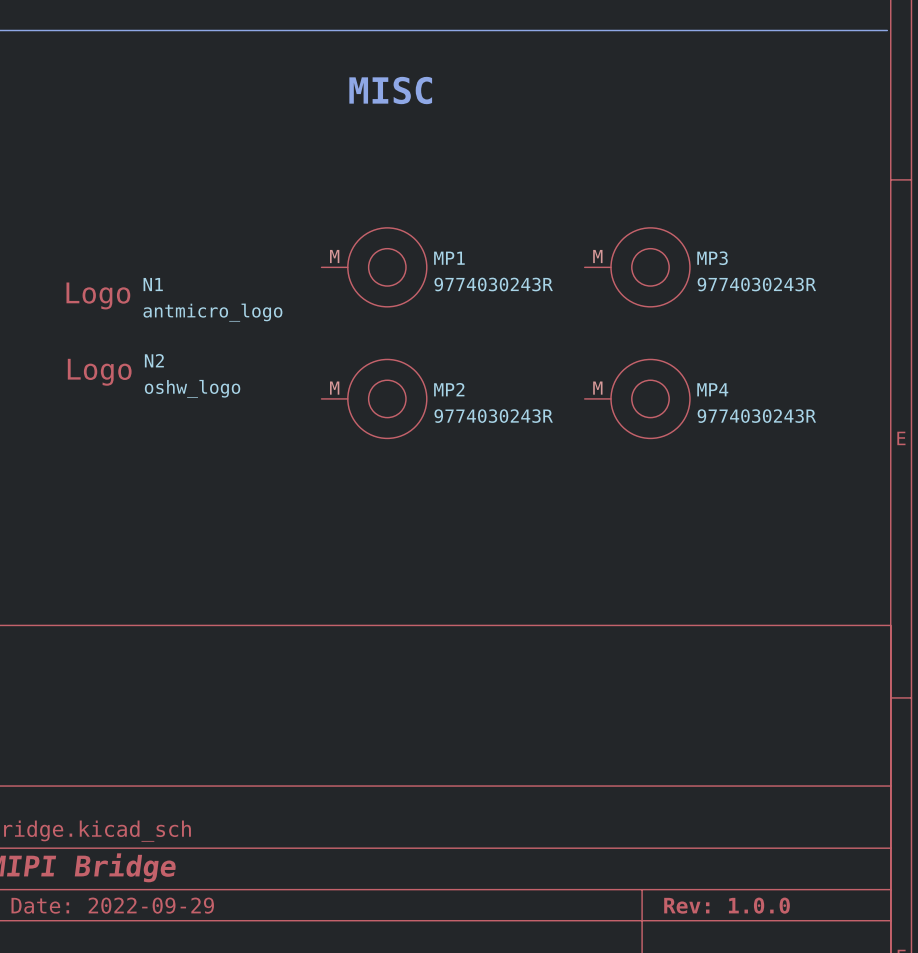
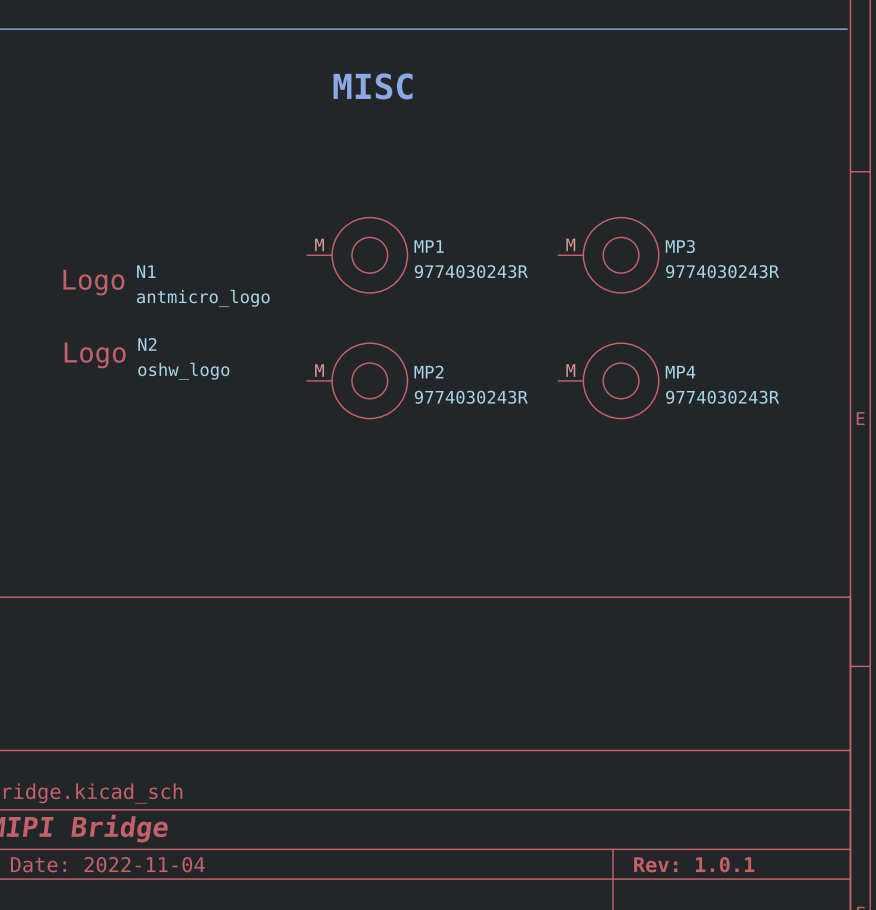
title block: Date: 2022-09-29 (112, 905) -> Date: 2022-11-04 (107, 864)
title block: Rev: 1.0.0 (727, 905) -> Rev: 1.0.1 (694, 864)

